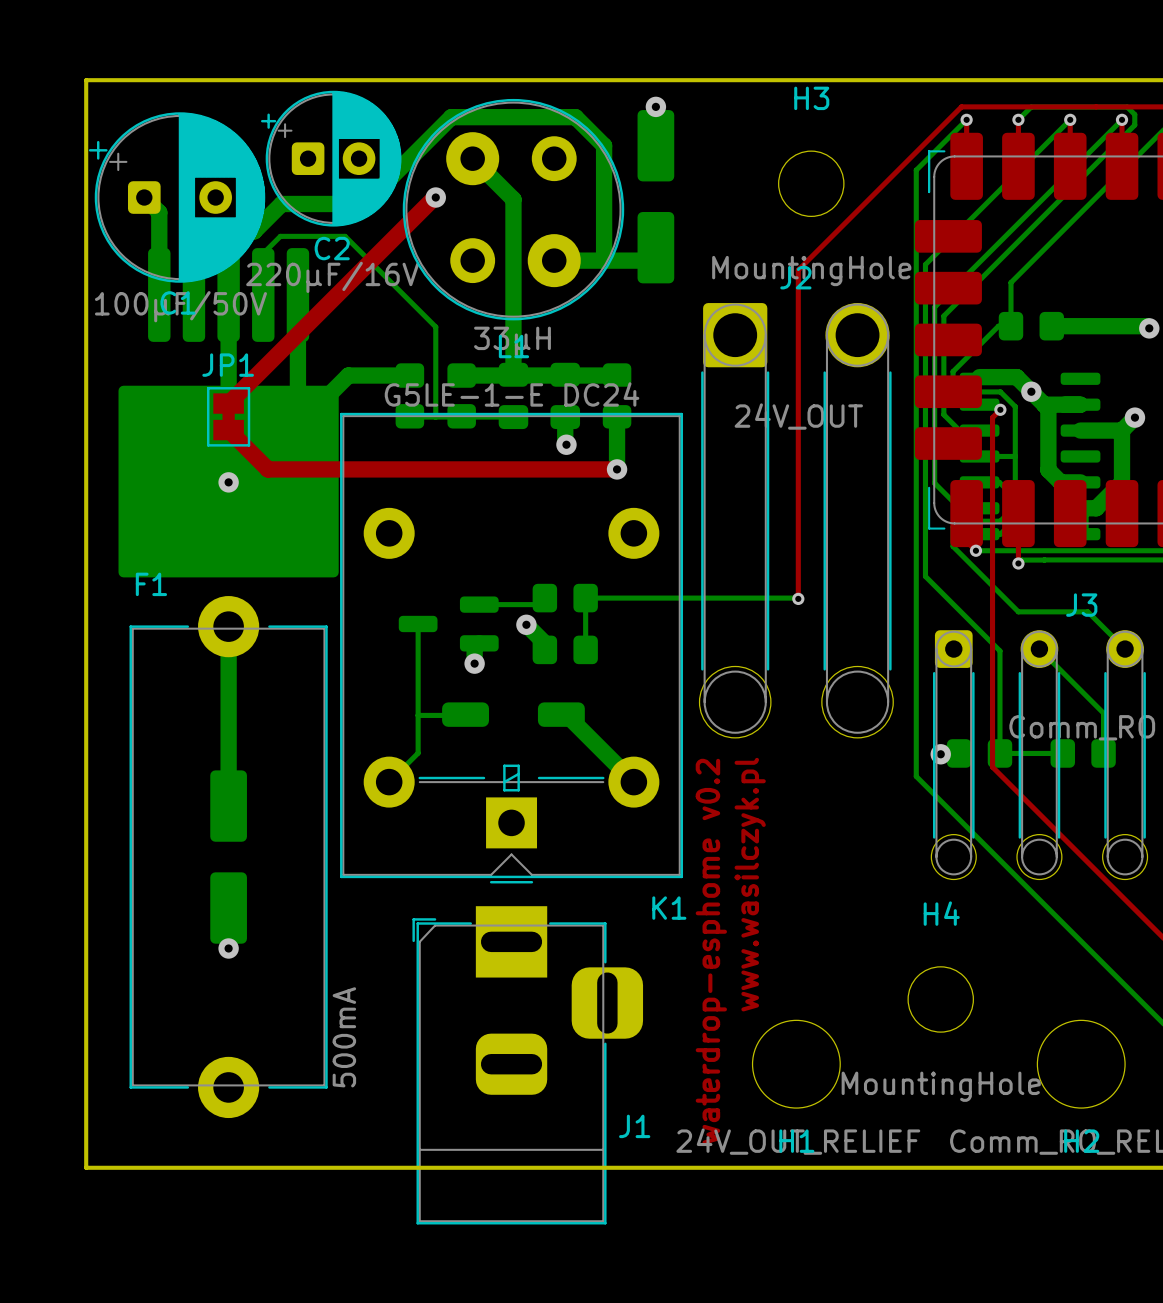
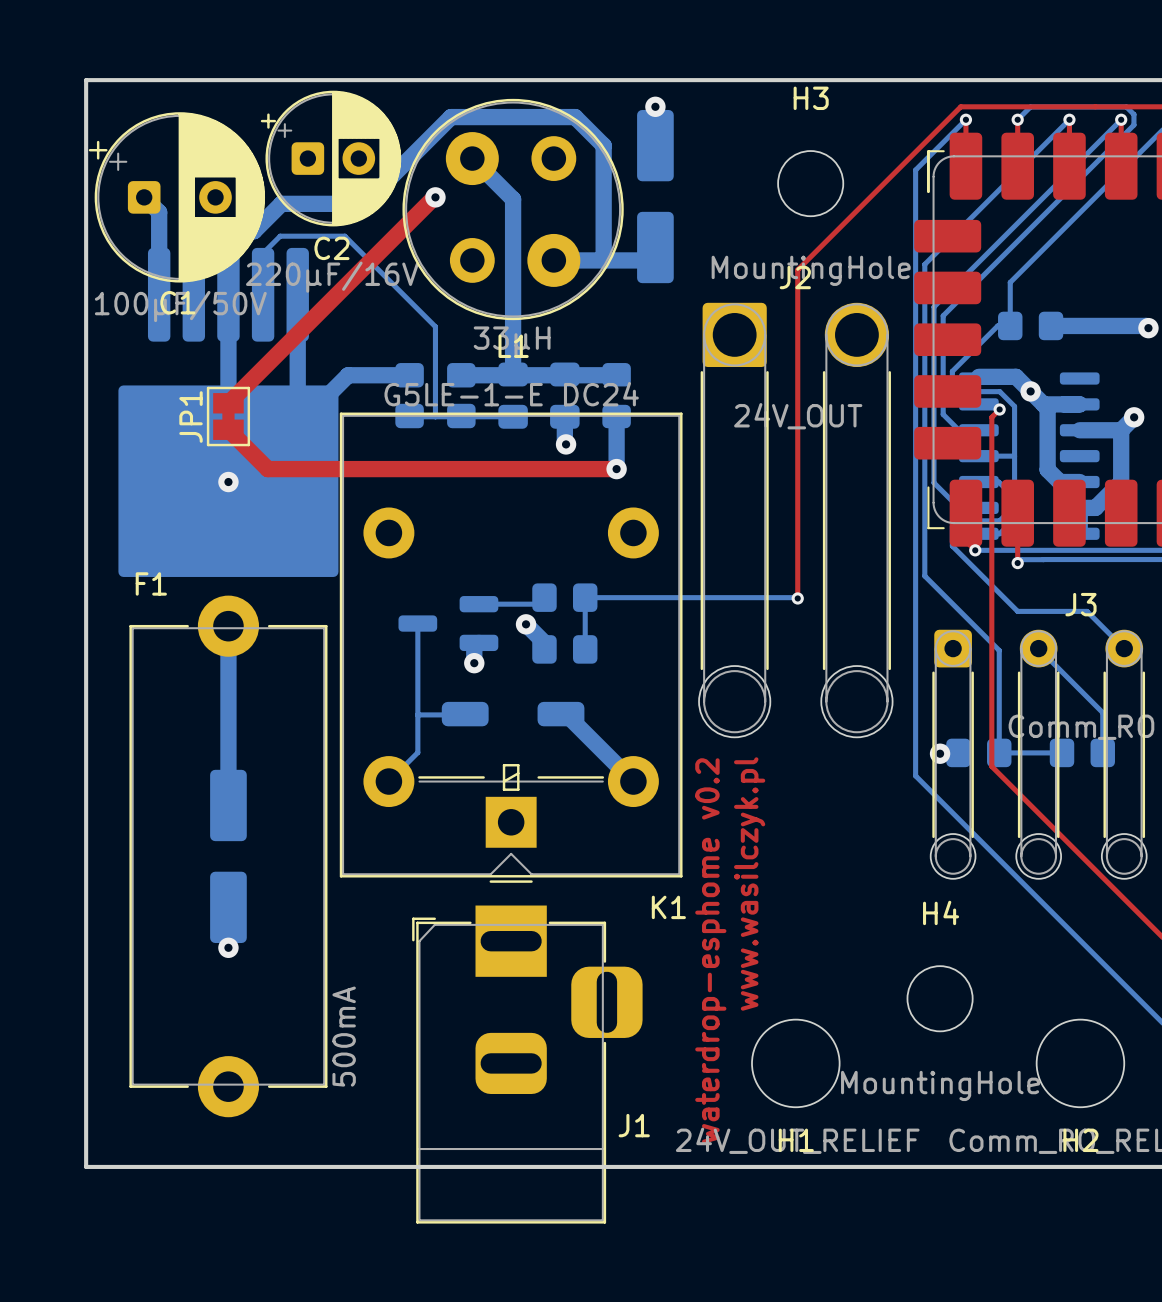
JP1 name rotation: 0° (228, 365) -> 90° counterclockwise (191, 417)

